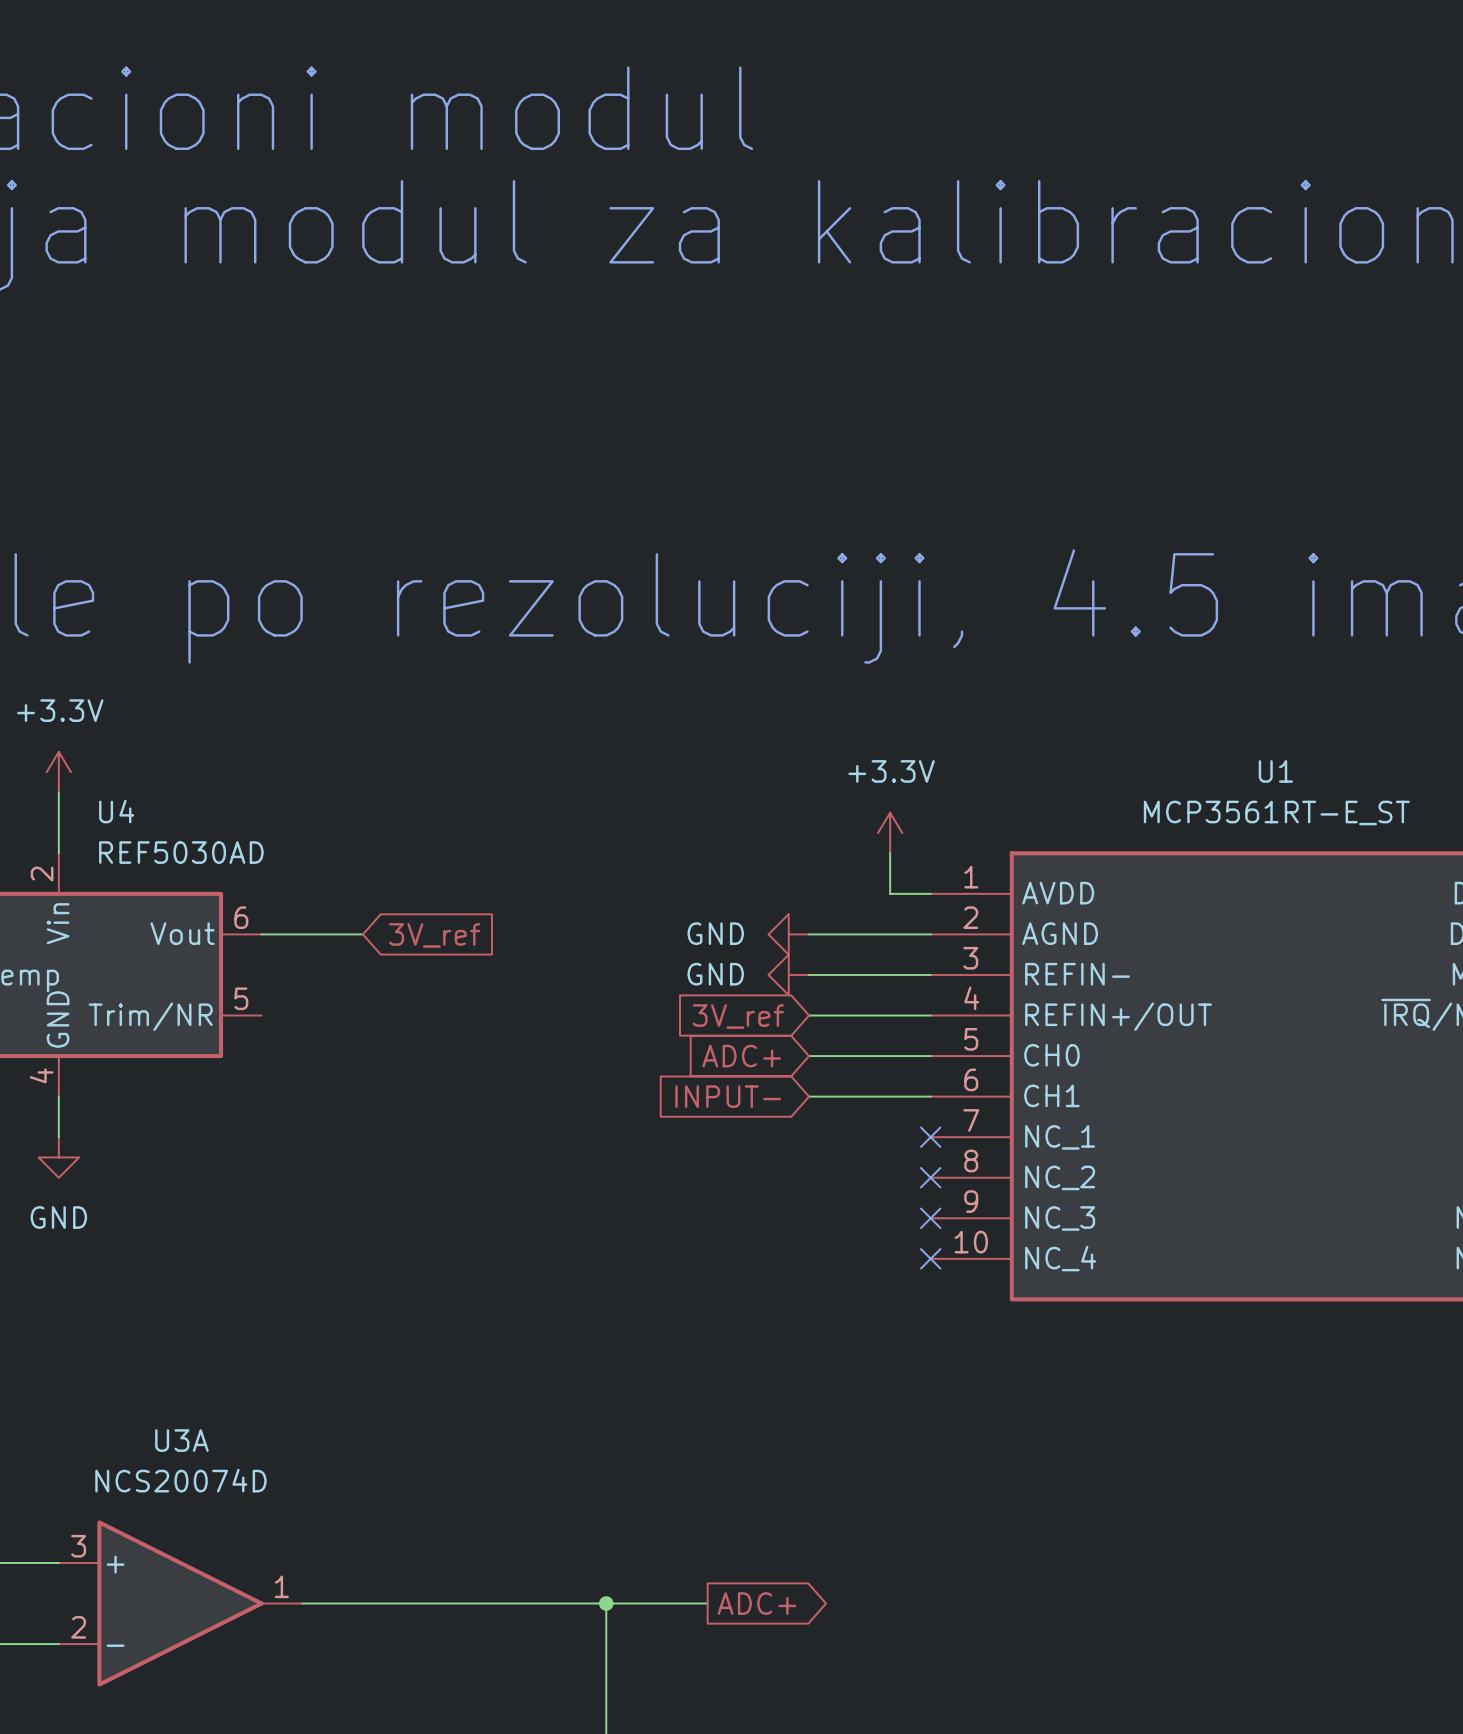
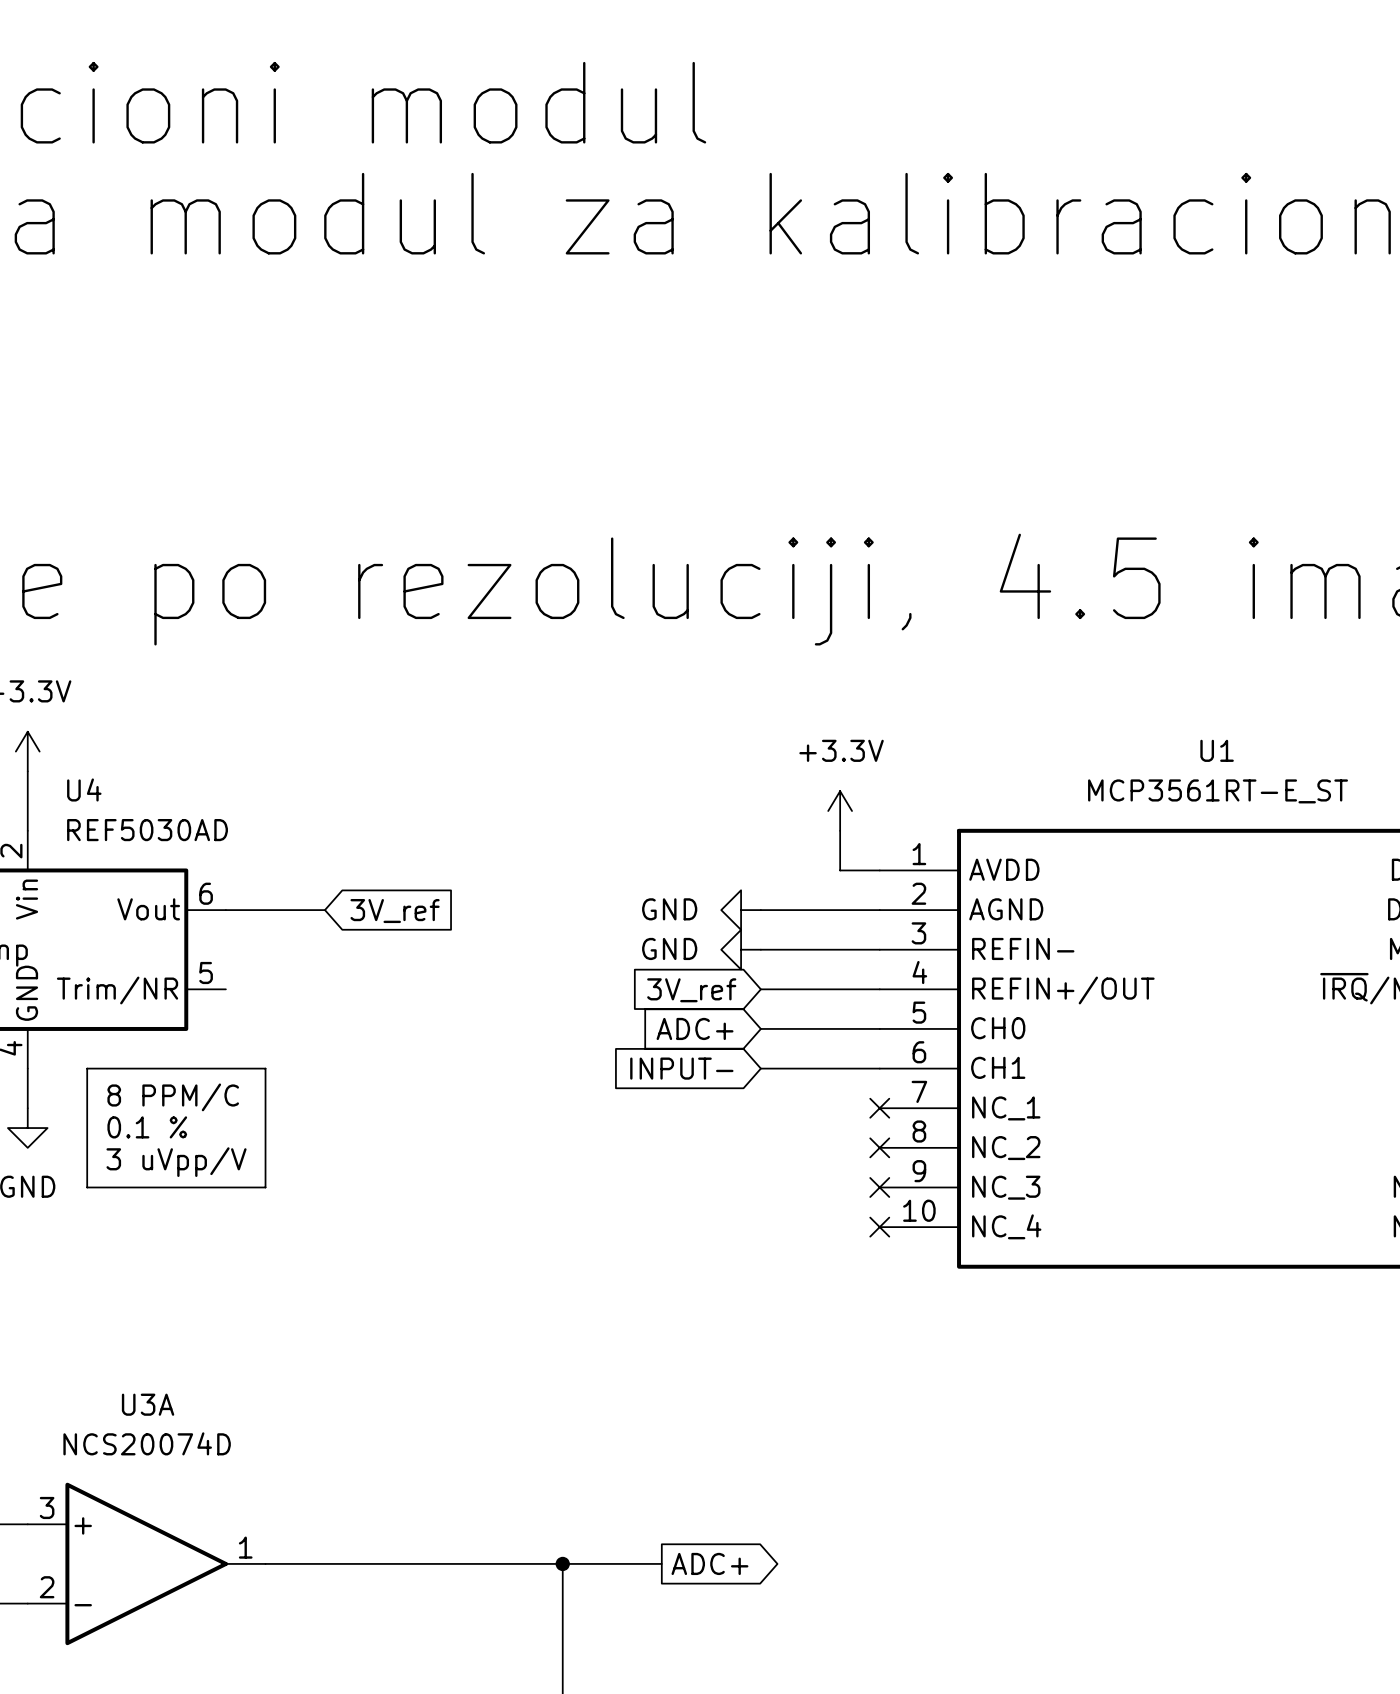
line: none -> (87, 1068) (265, 1068) (265, 1187) (87, 1187) (87, 1068)
text: none -> 8 PPM/C (173, 1097)
text: none -> 0.1 % (147, 1127)
text: none -> 3 uVpp/V (176, 1162)

